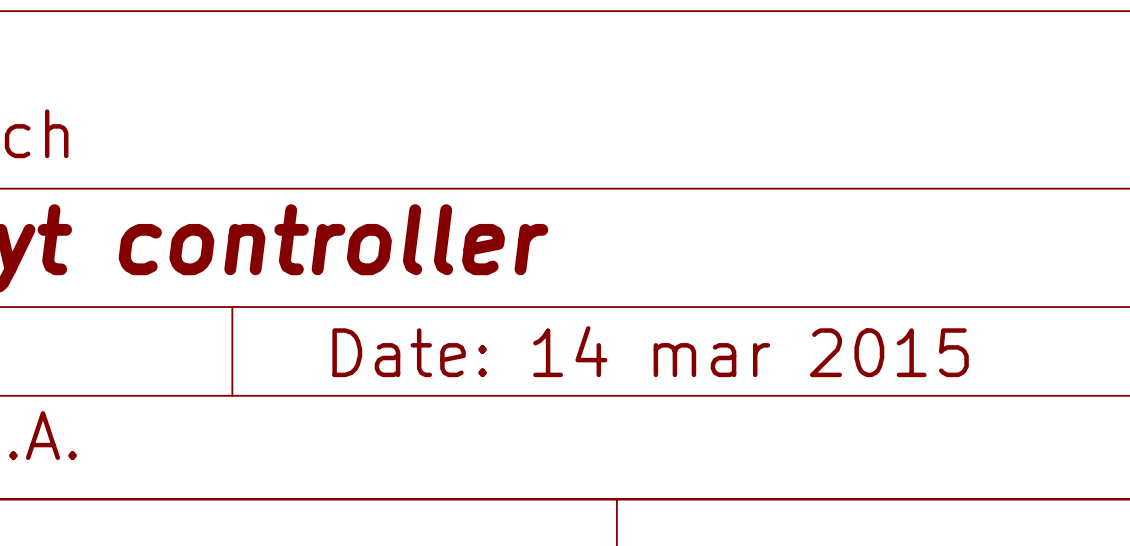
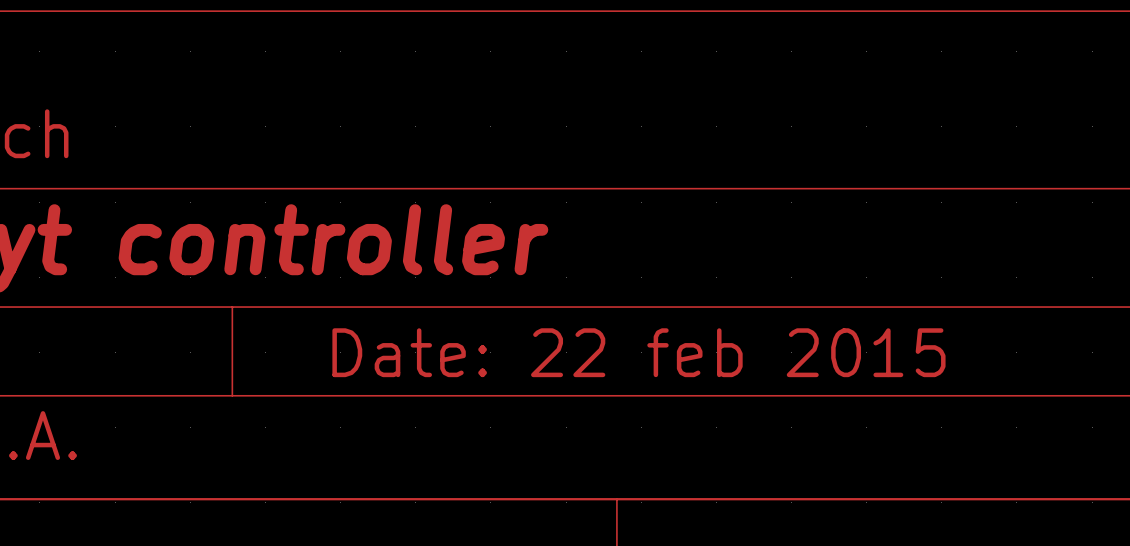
title block: Date: 14 mar 2015 (650, 351) -> Date: 22 feb 2015 (638, 352)

